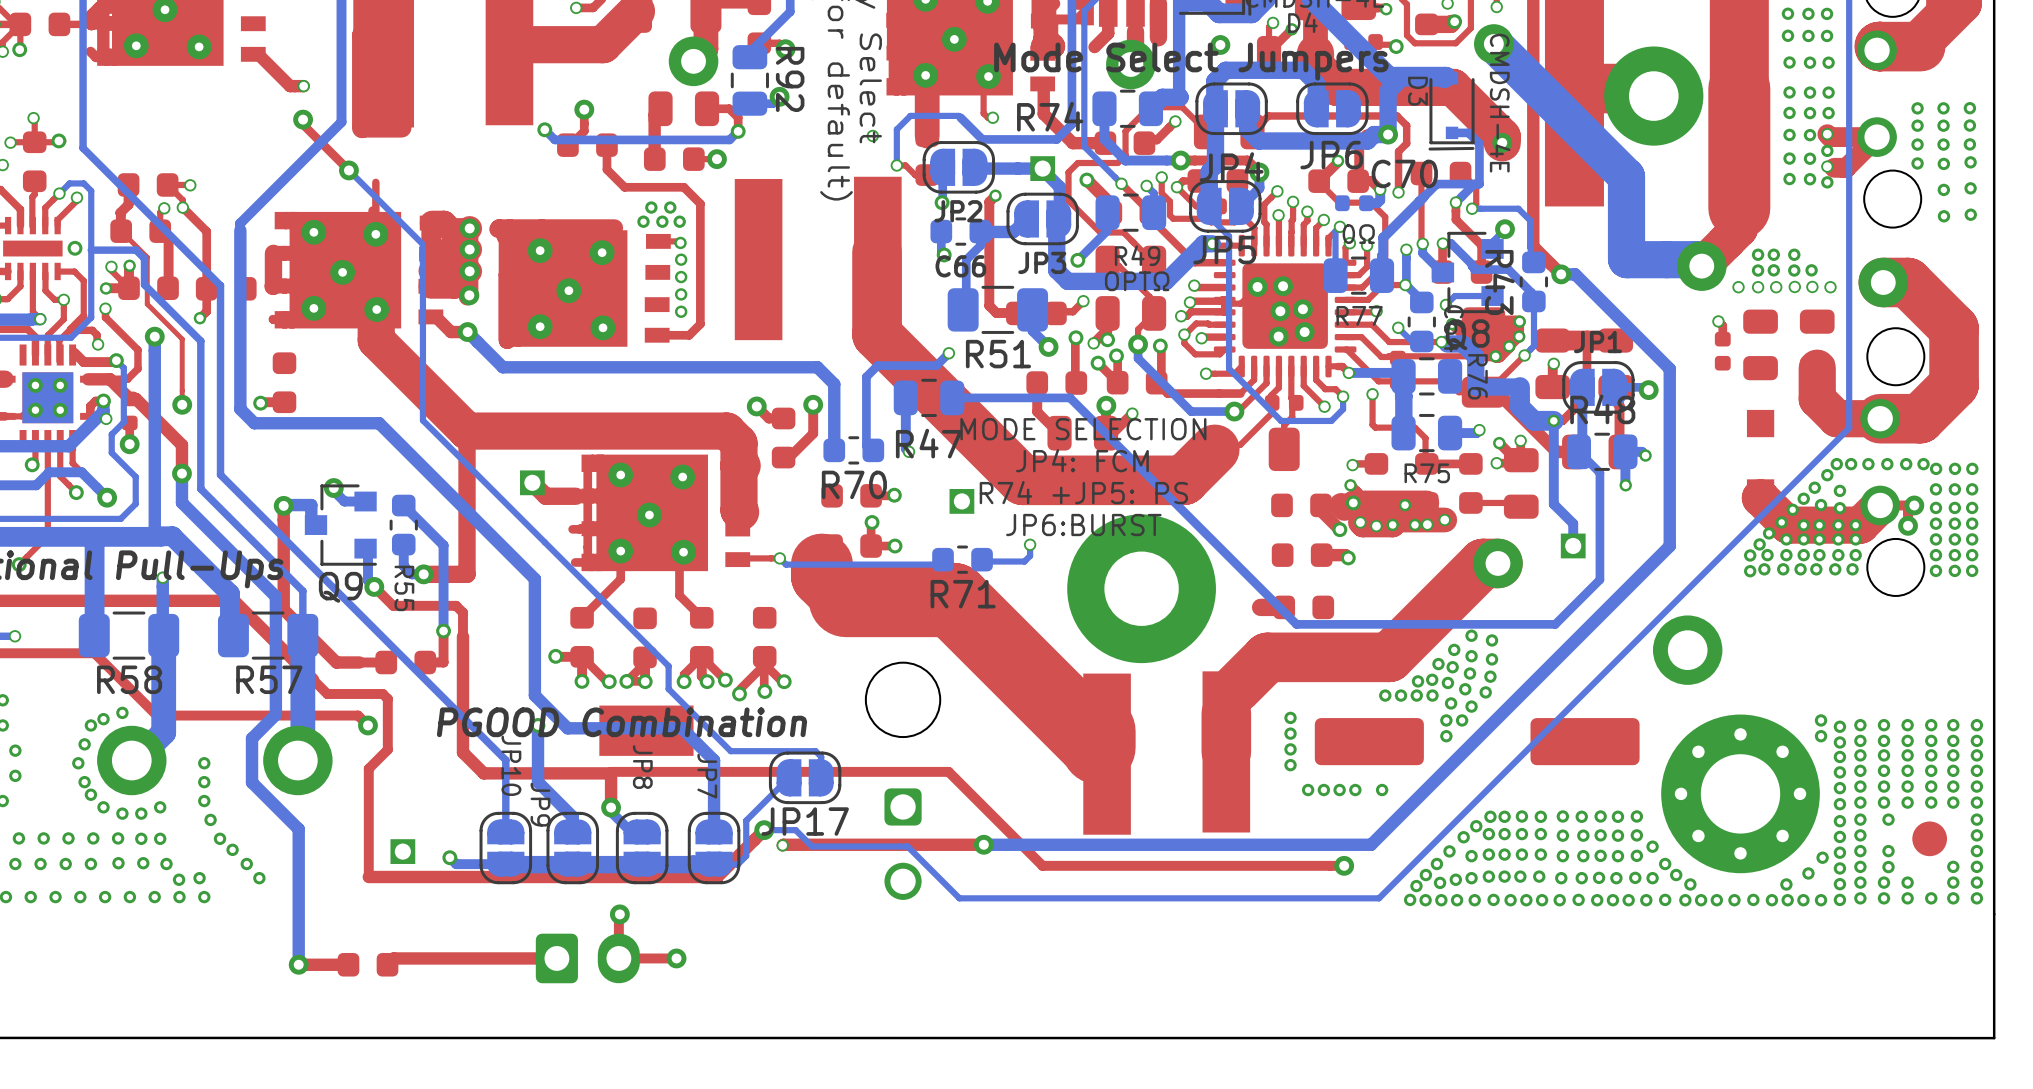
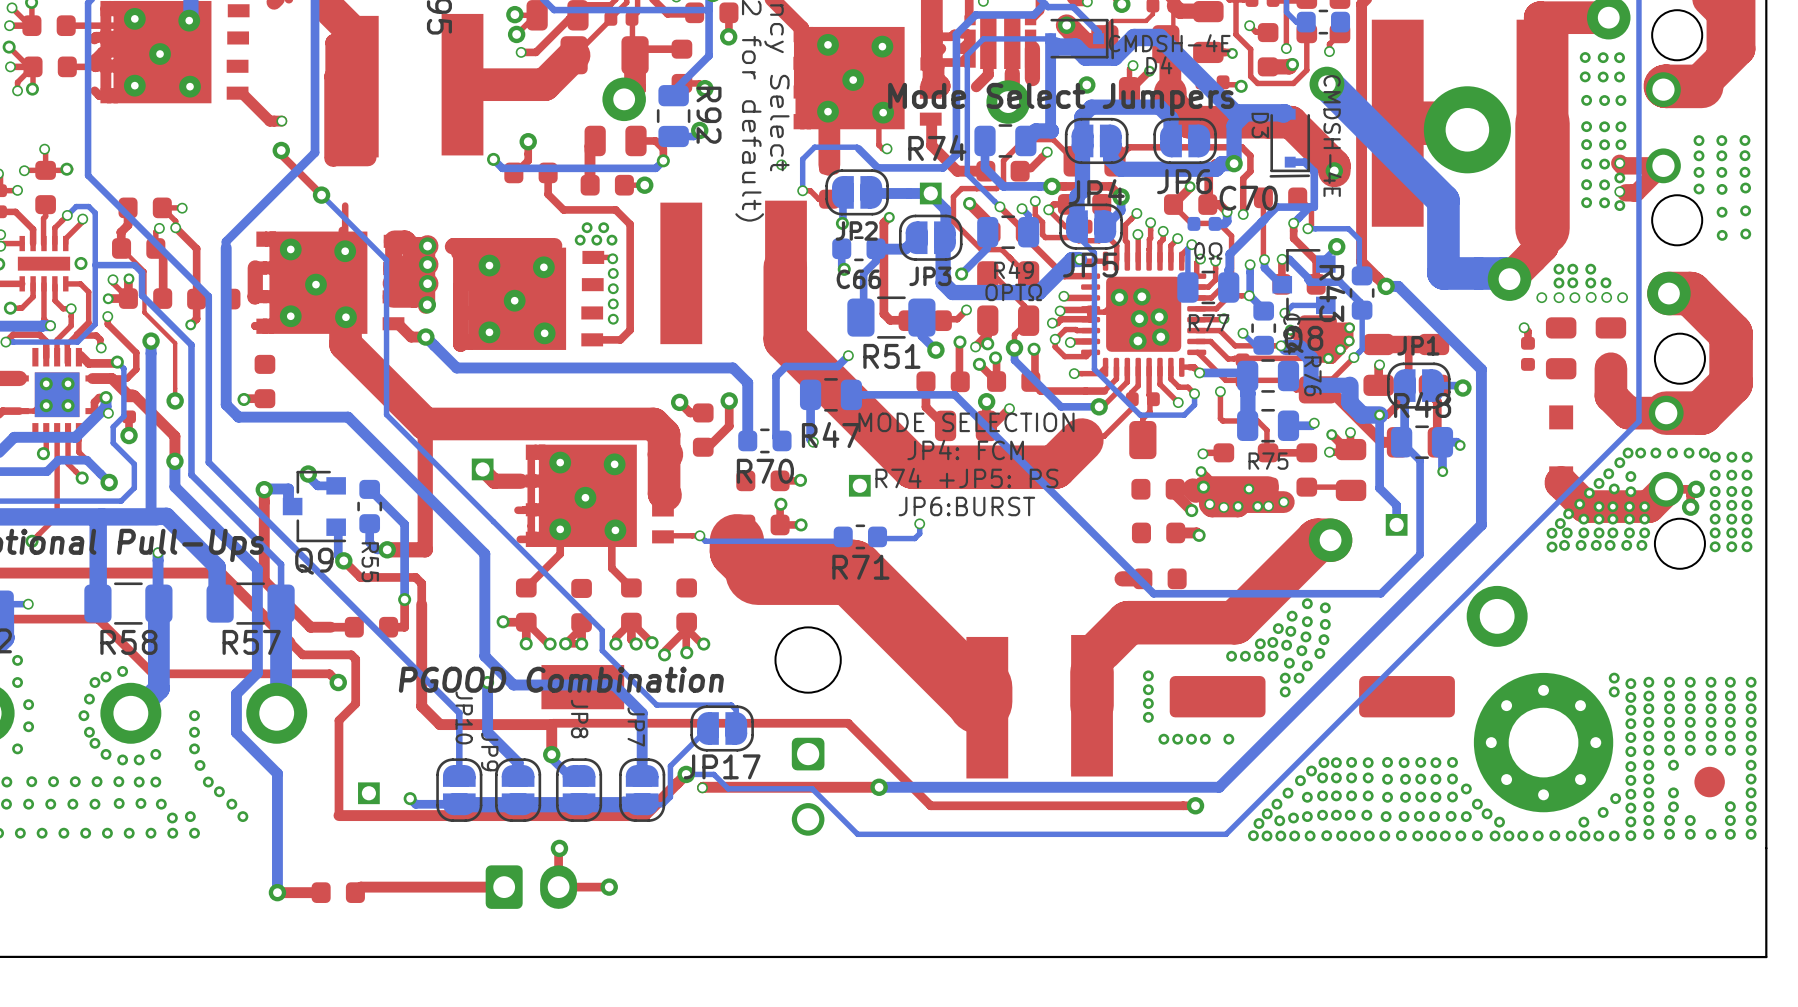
via: (1141, 588) -> none

